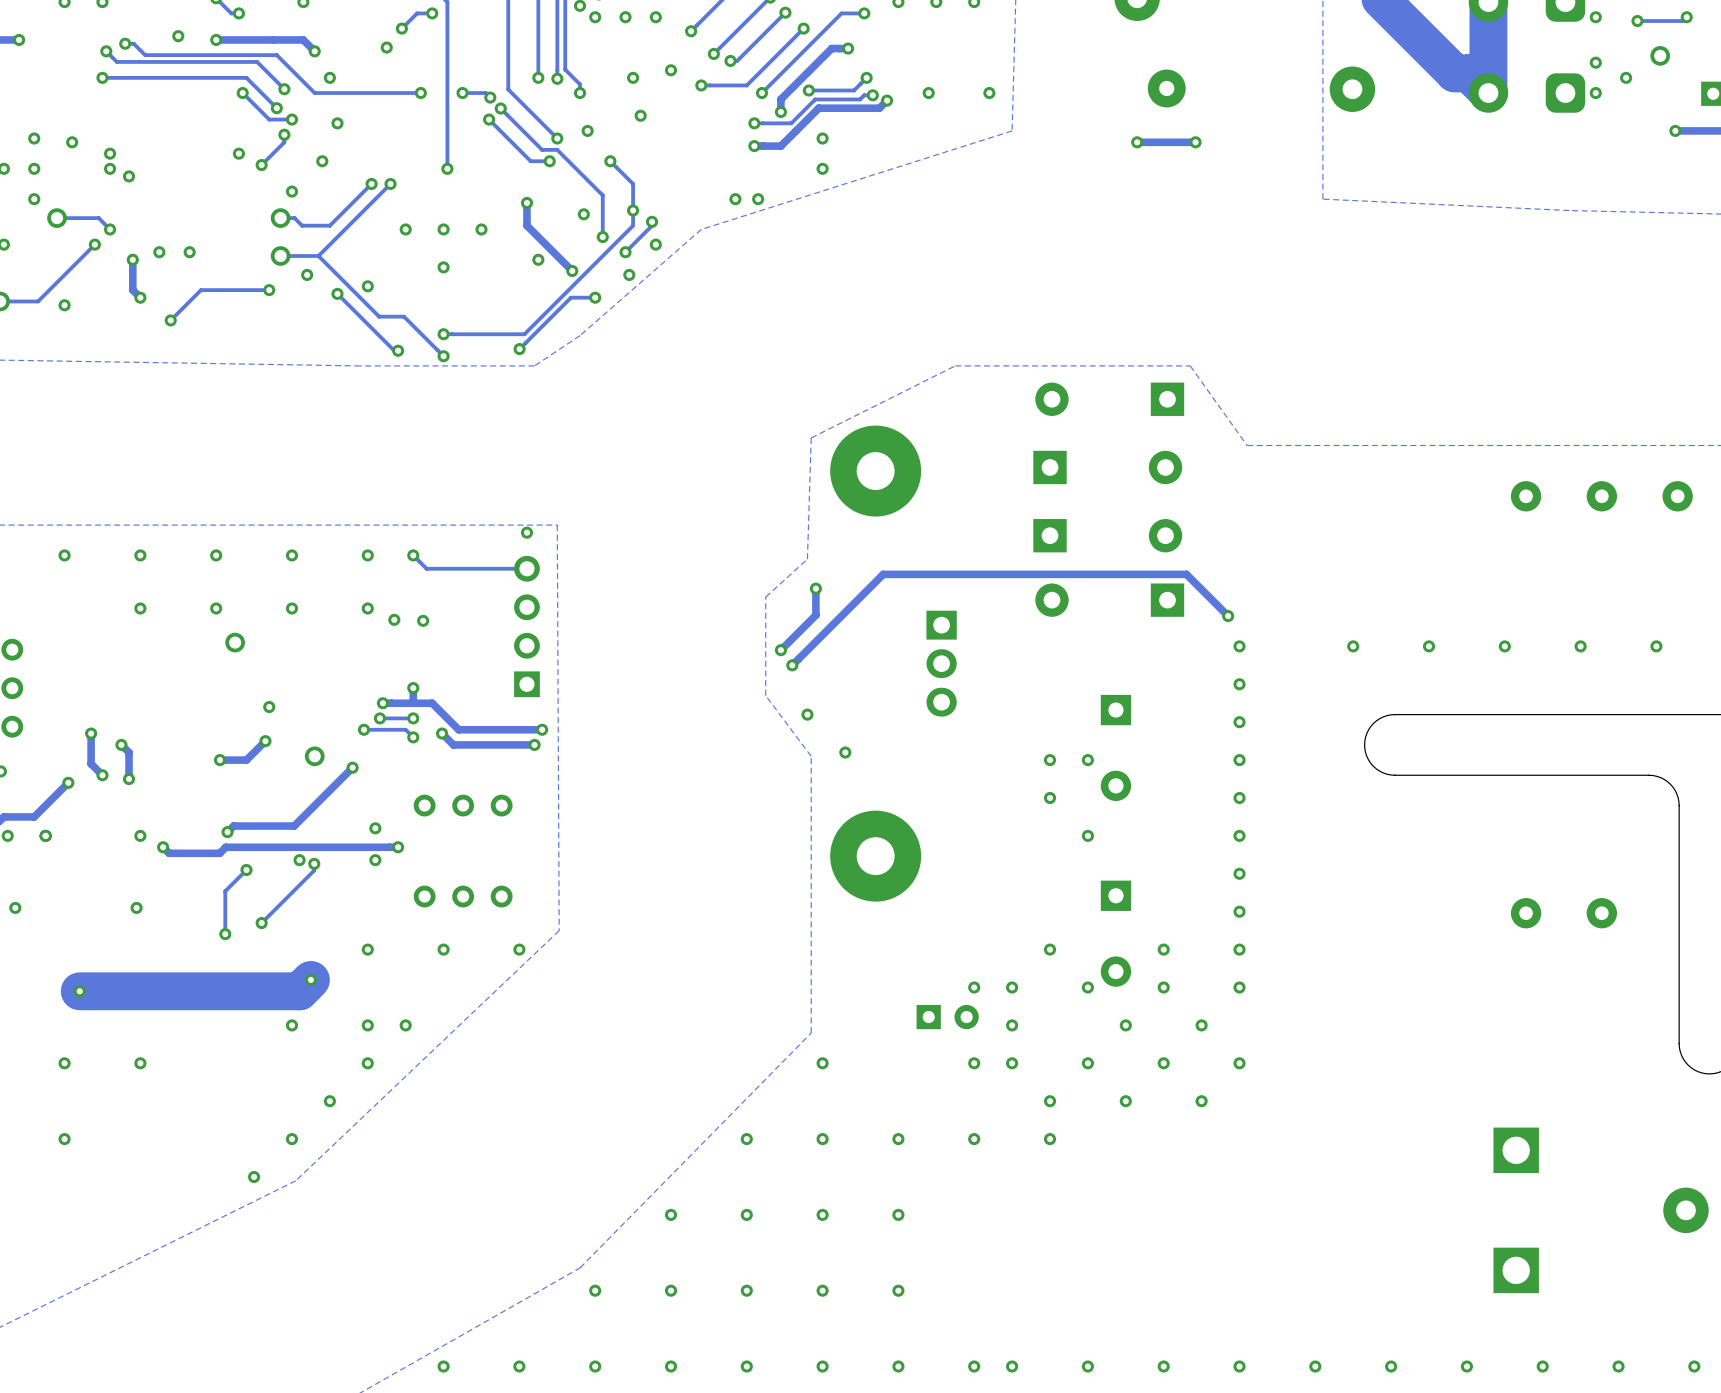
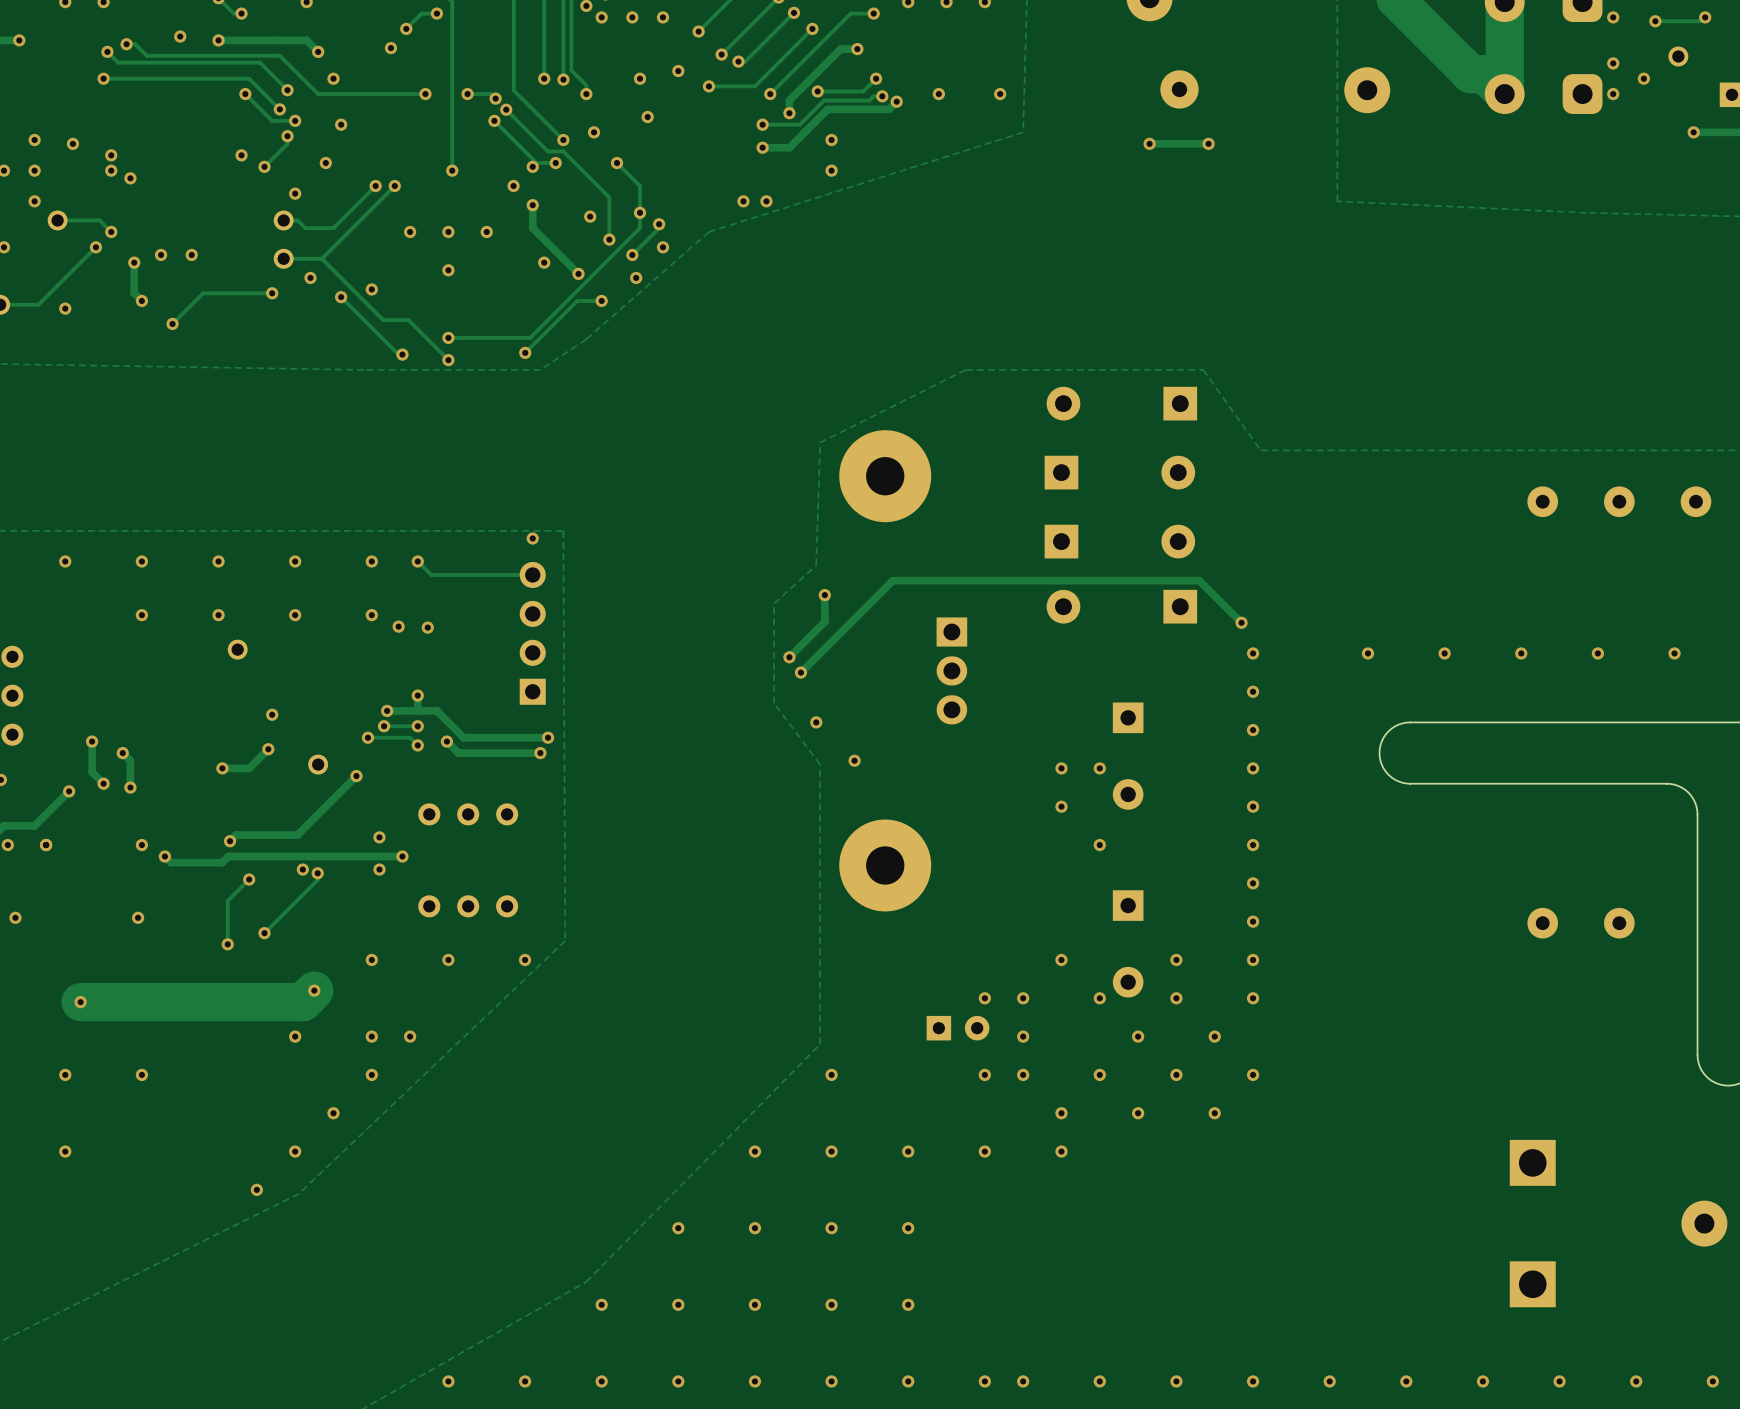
via: none -> (532, 166)
via: none -> (513, 186)

